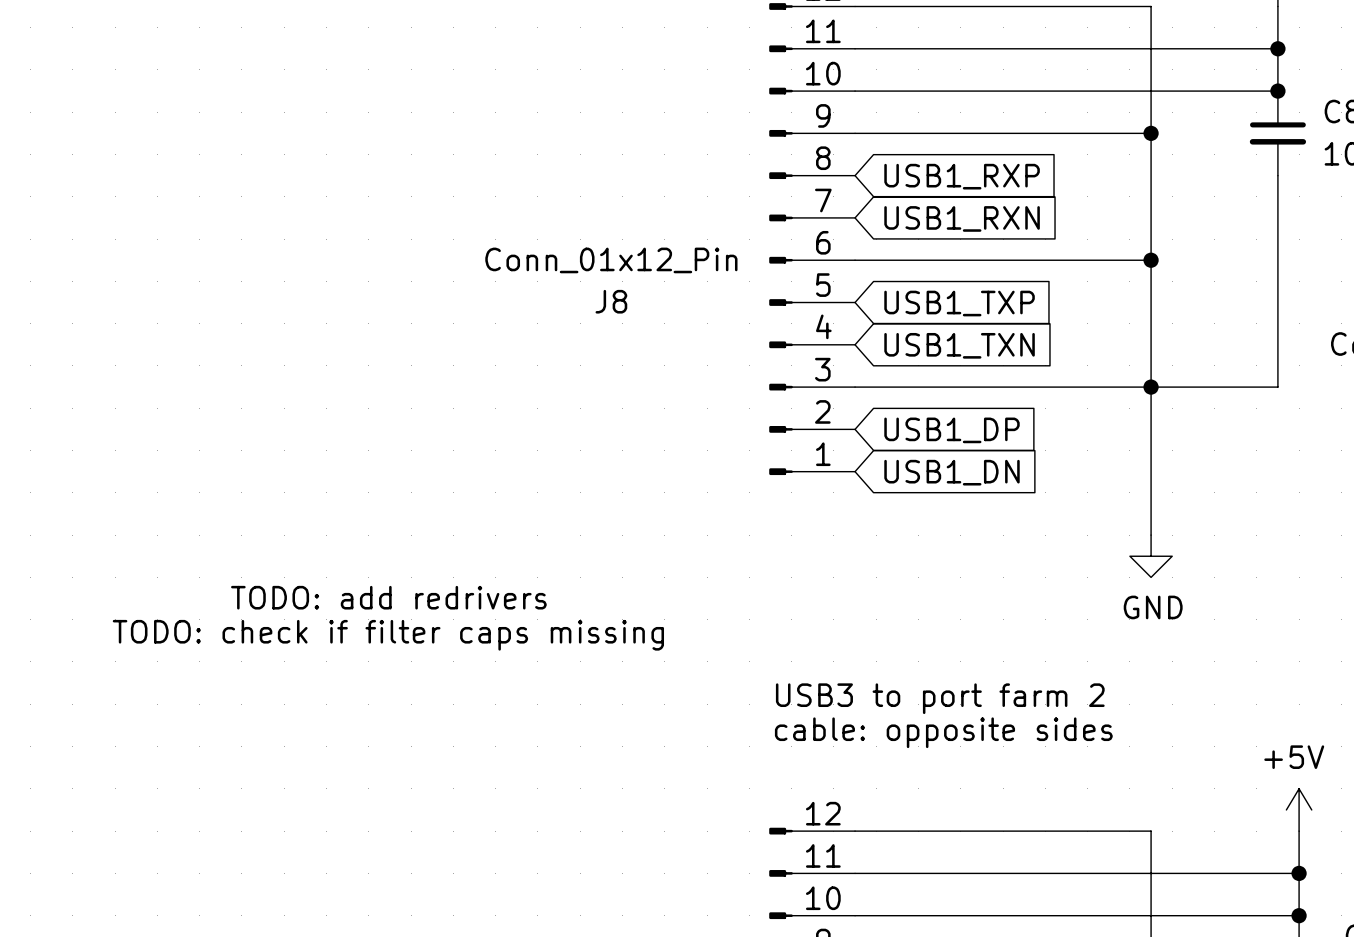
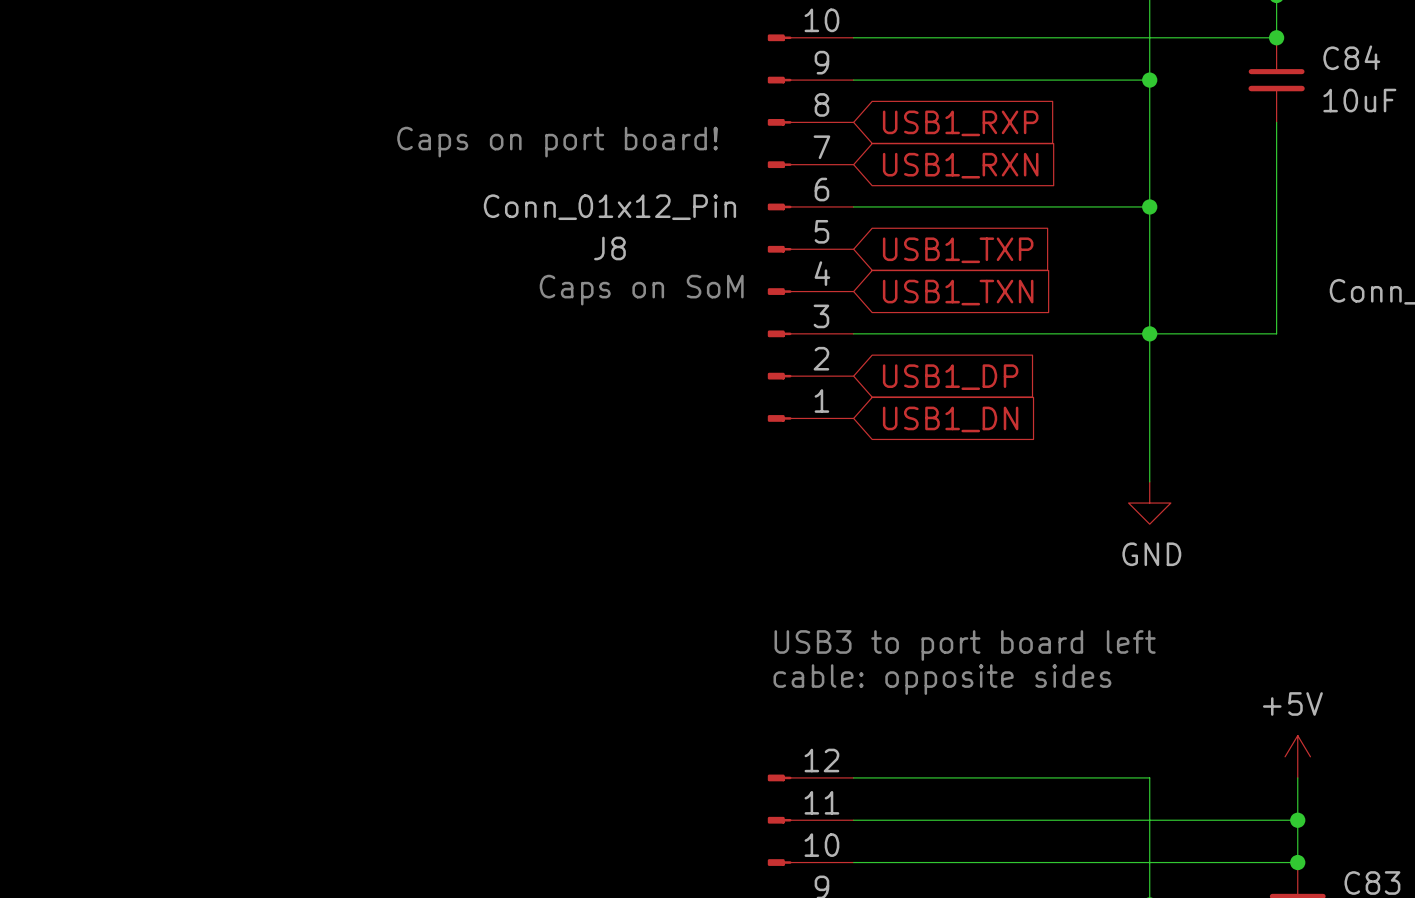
text: none -> Caps on port board! (557, 142)
text: none -> Caps on SoM (641, 290)
text: TODO: add redrivers (388, 597) -> none
text: TODO: check if filter caps missing (388, 635) -> none
text: USB3 to port farm 2 (940, 698) -> USB3 to port board left (965, 645)

